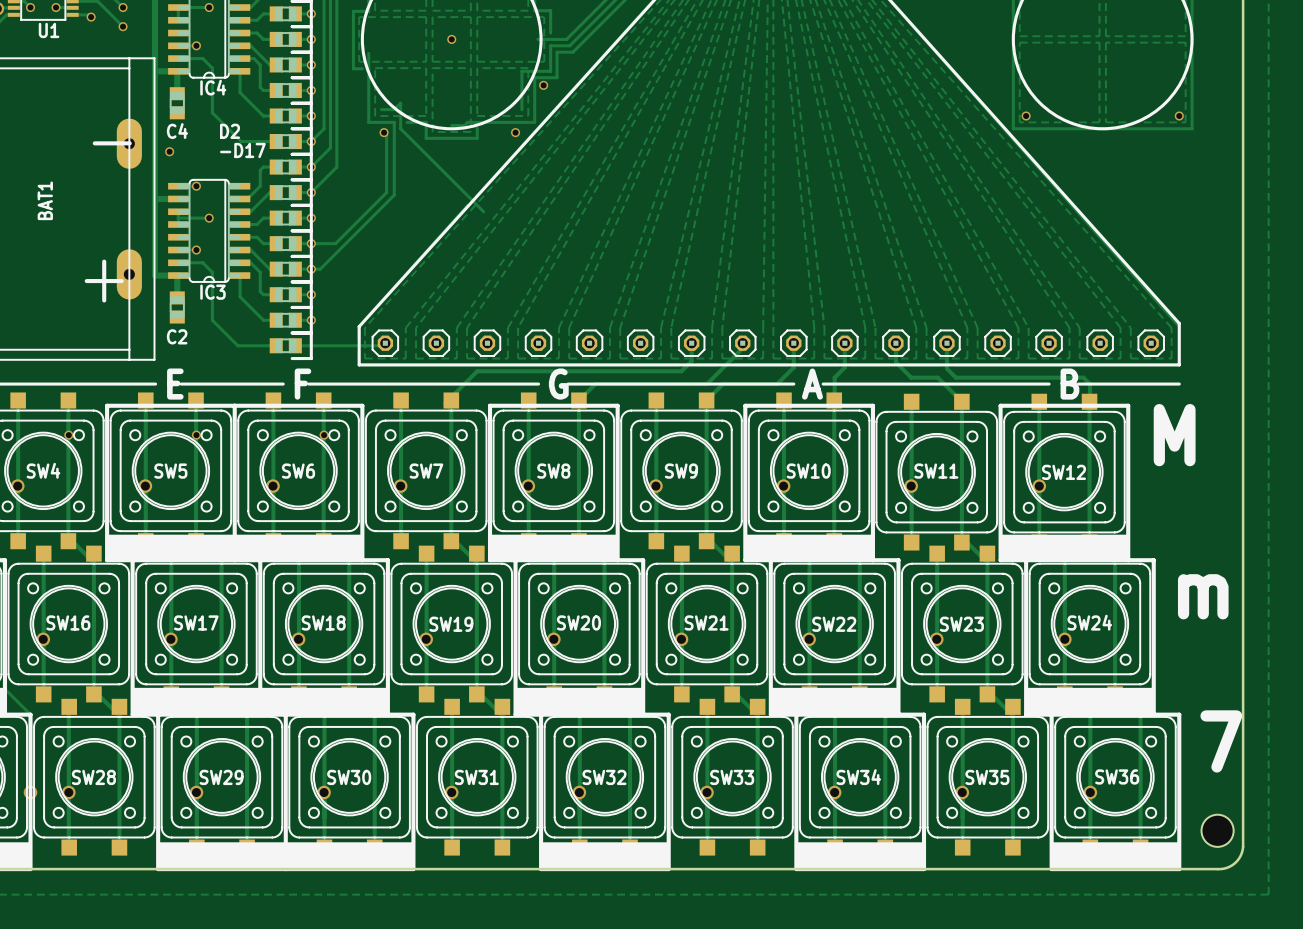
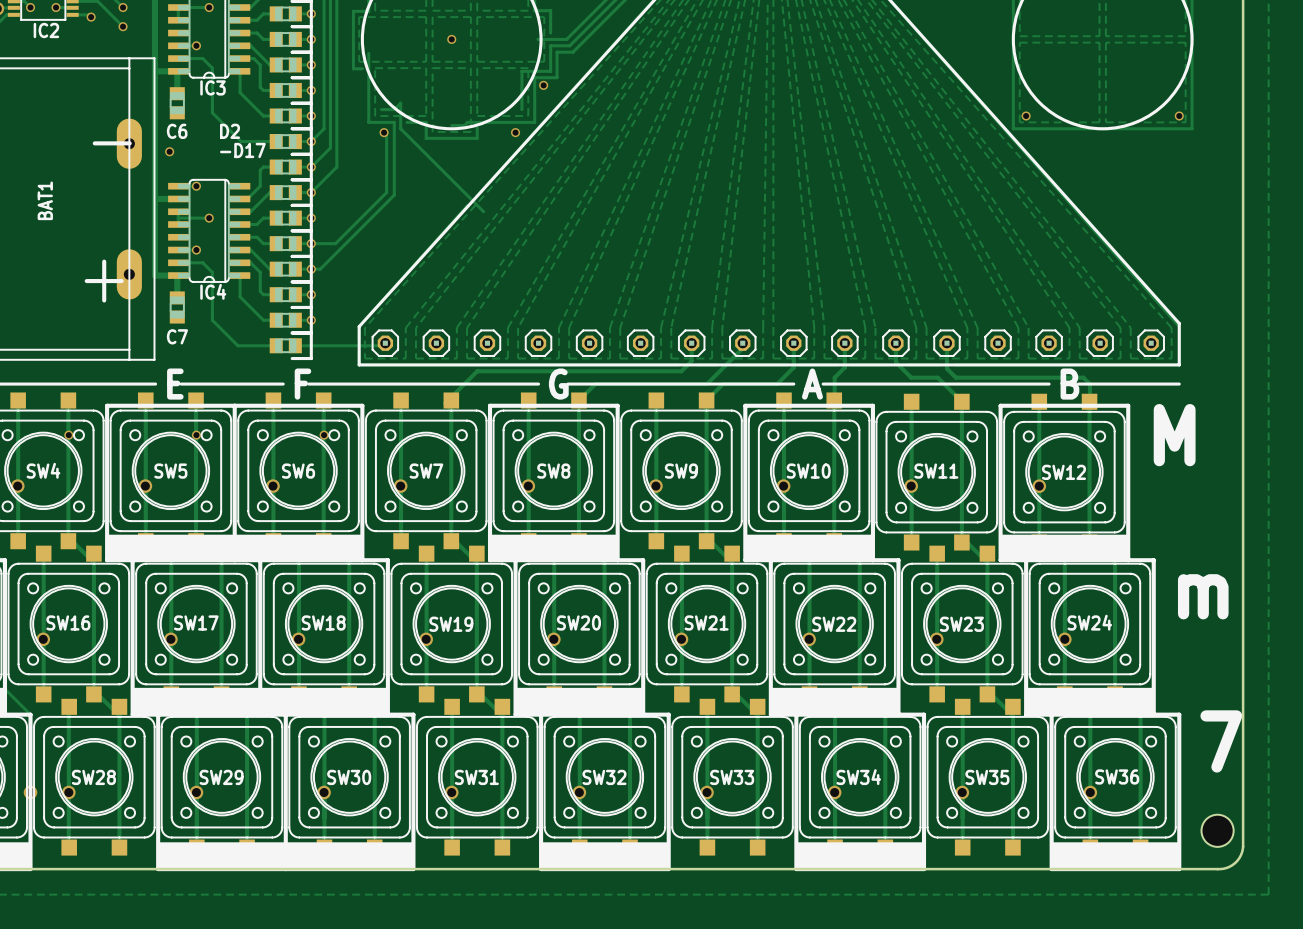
U1 name: U1 (49, 30) -> IC2 (46, 30)
IC4 name: IC4 (213, 87) -> IC3 (213, 87)
C4 name: C4 (177, 131) -> C6 (177, 131)
IC3 name: IC3 (213, 292) -> IC4 (213, 291)
C2 name: C2 (177, 336) -> C7 (177, 336)

